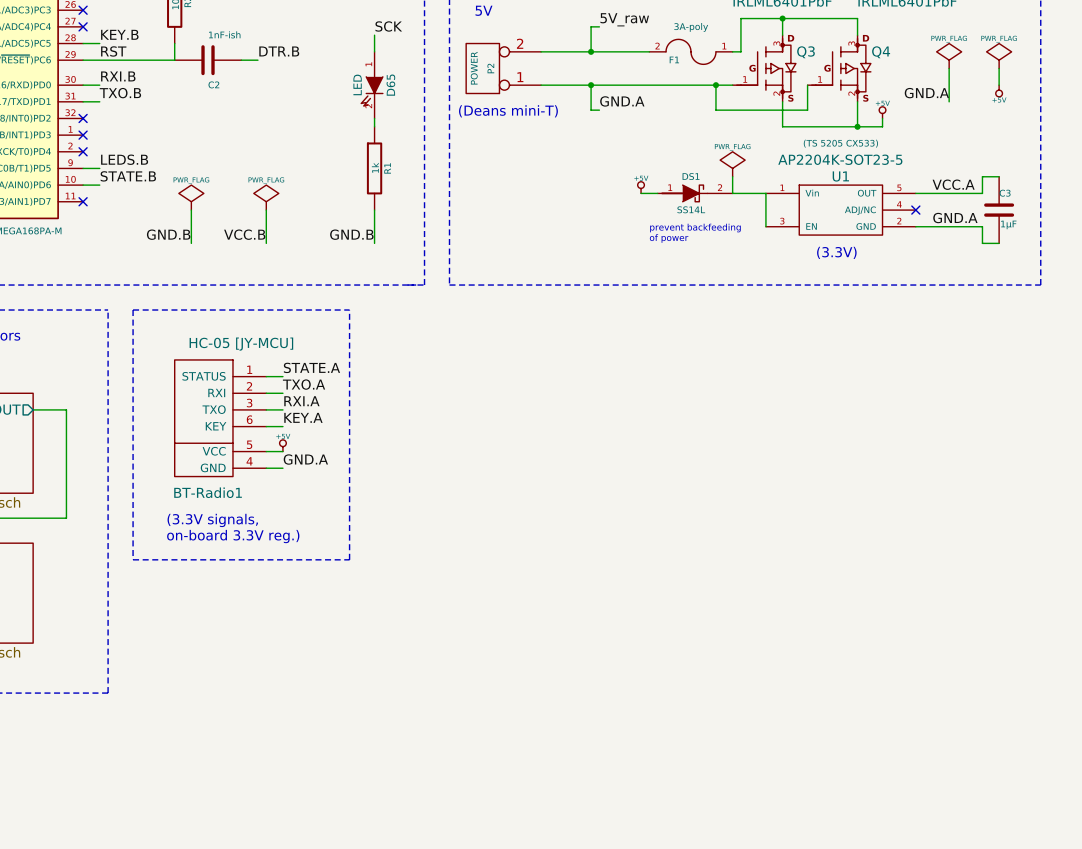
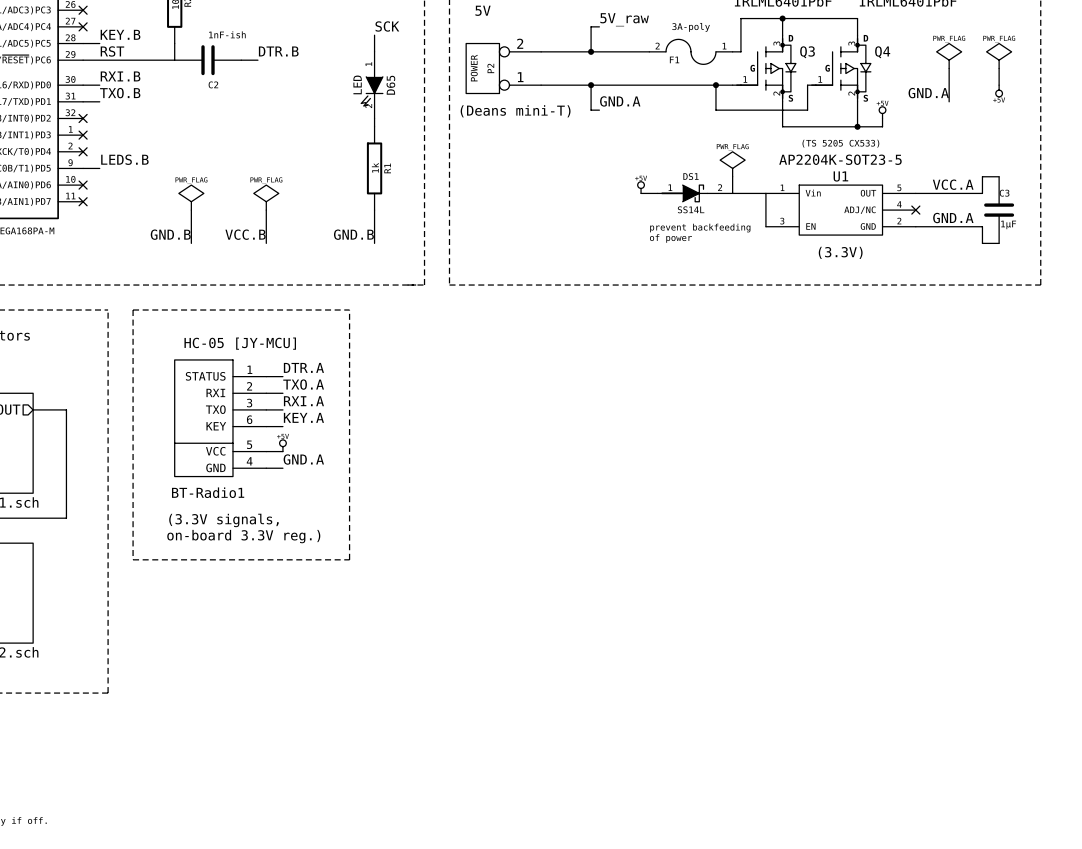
label: STATE.B (128, 176) -> none
wire: (83, 185) (99, 185) -> none
no-connect mark: none -> (83, 185)
label: STATE.A (311, 367) -> DTR.A (303, 367)

